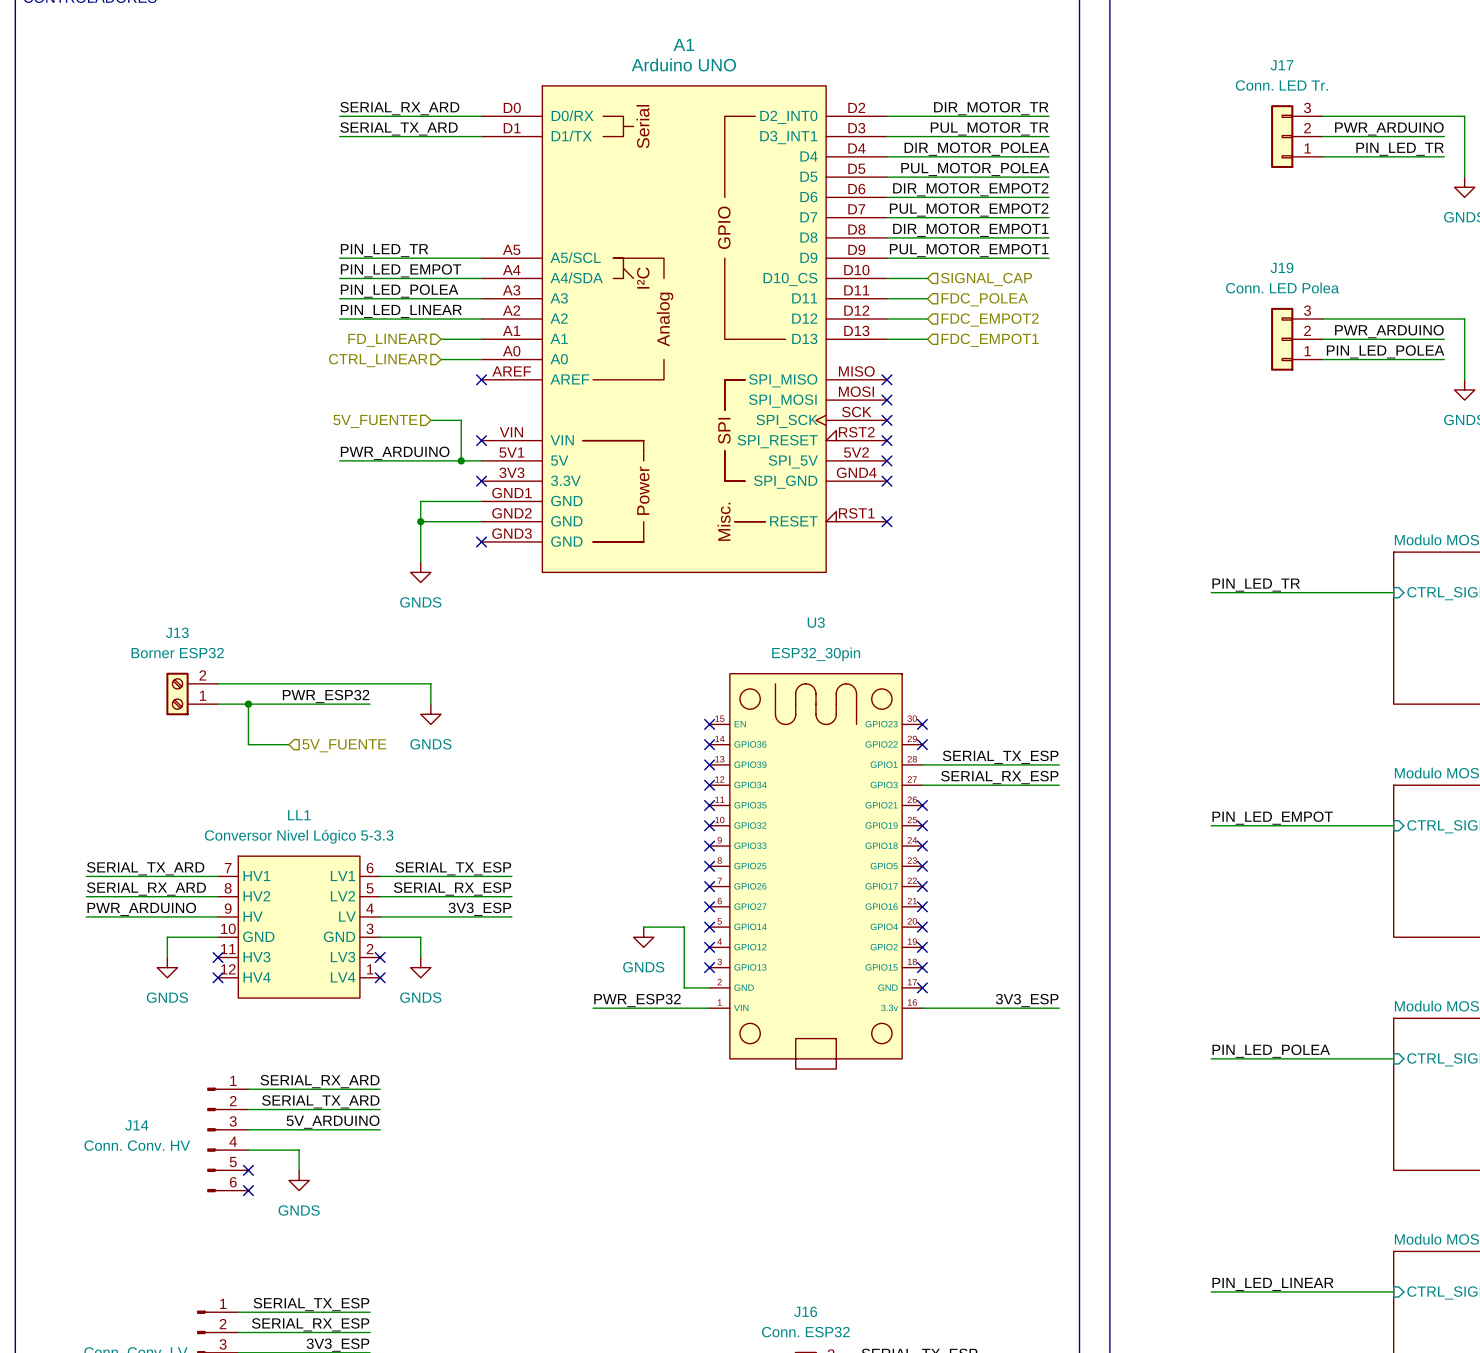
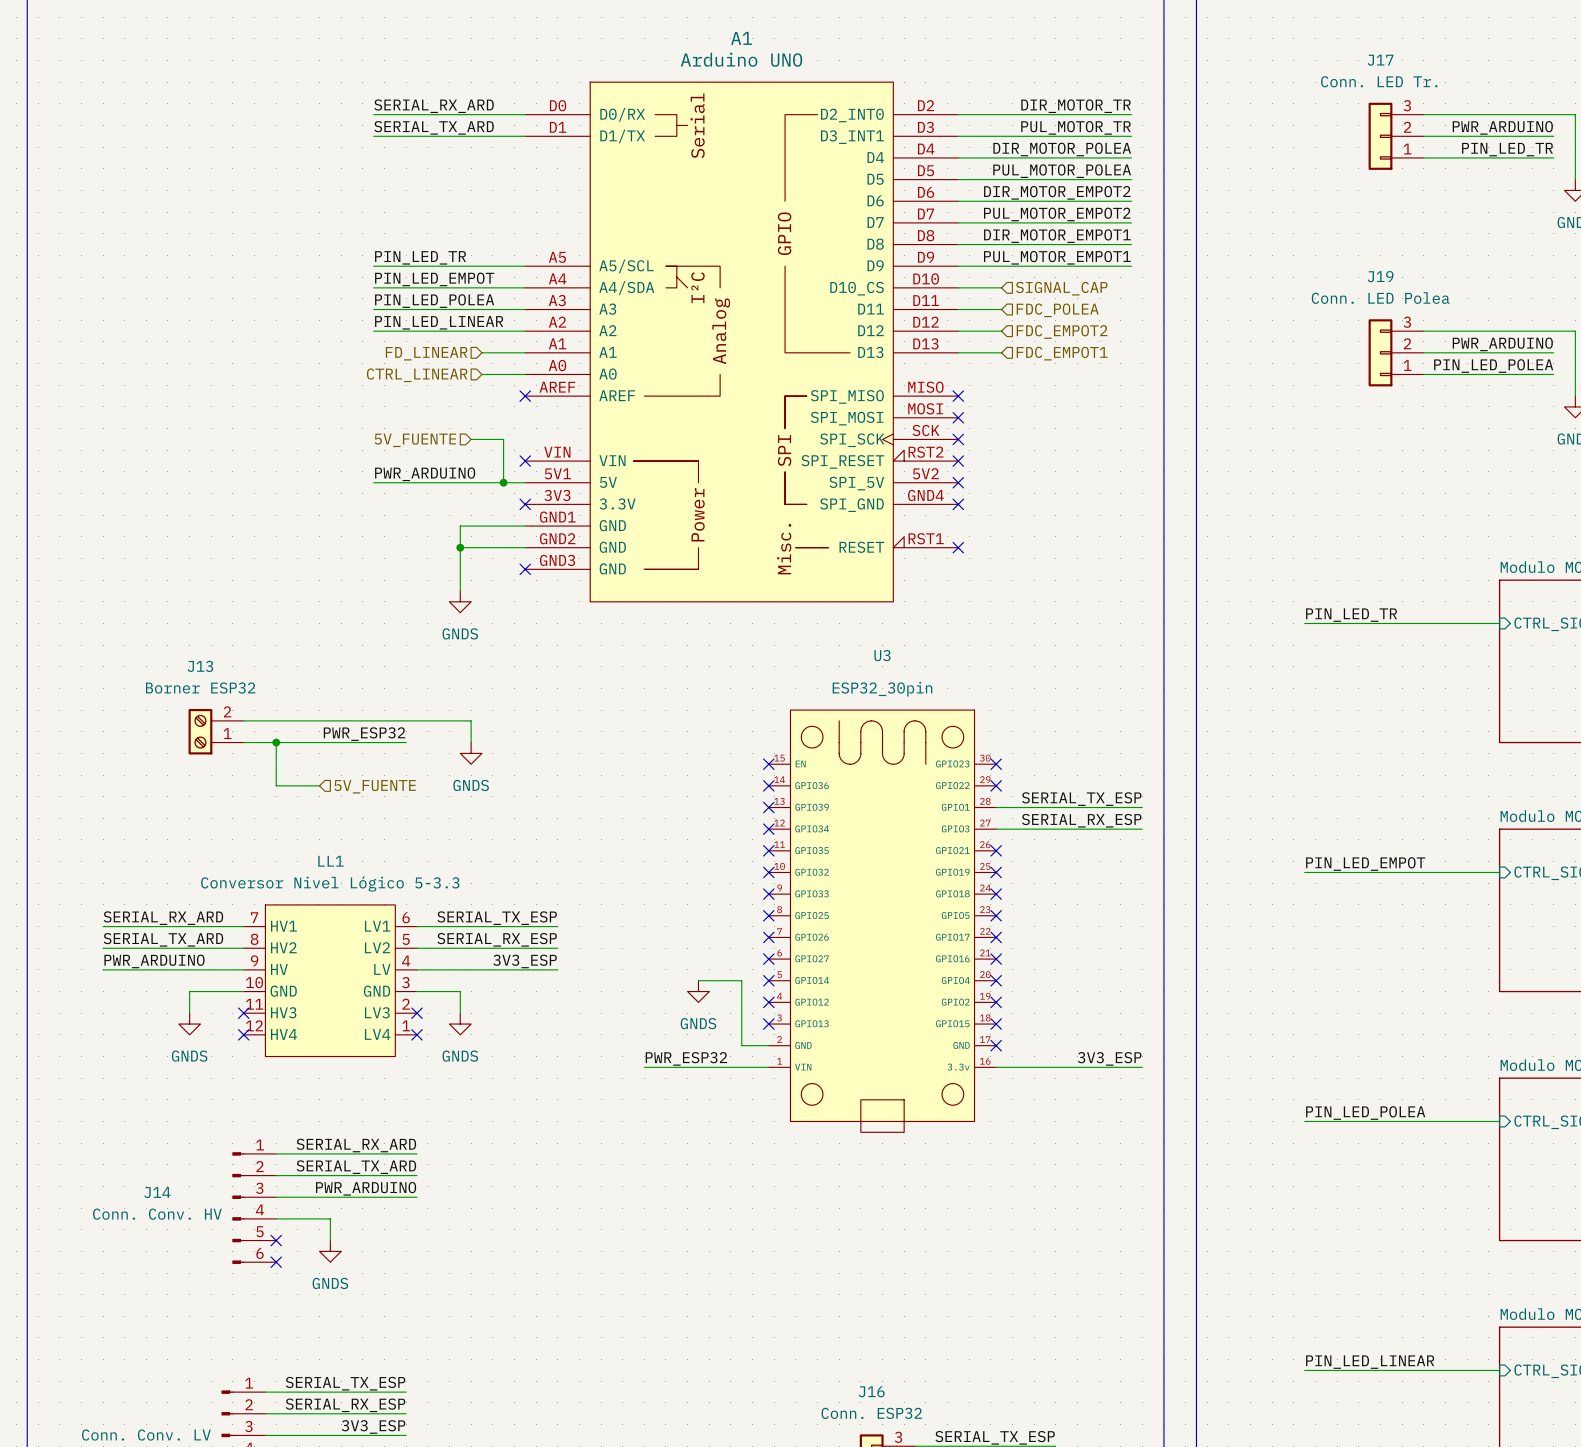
label: SERIAL_TX_ARD (145, 868) -> SERIAL_RX_ARD (163, 918)
label: SERIAL_RX_ARD (146, 889) -> SERIAL_TX_ARD (163, 939)
label: 5V_ARDUINO (333, 1122) -> PWR_ARDUINO (366, 1188)

